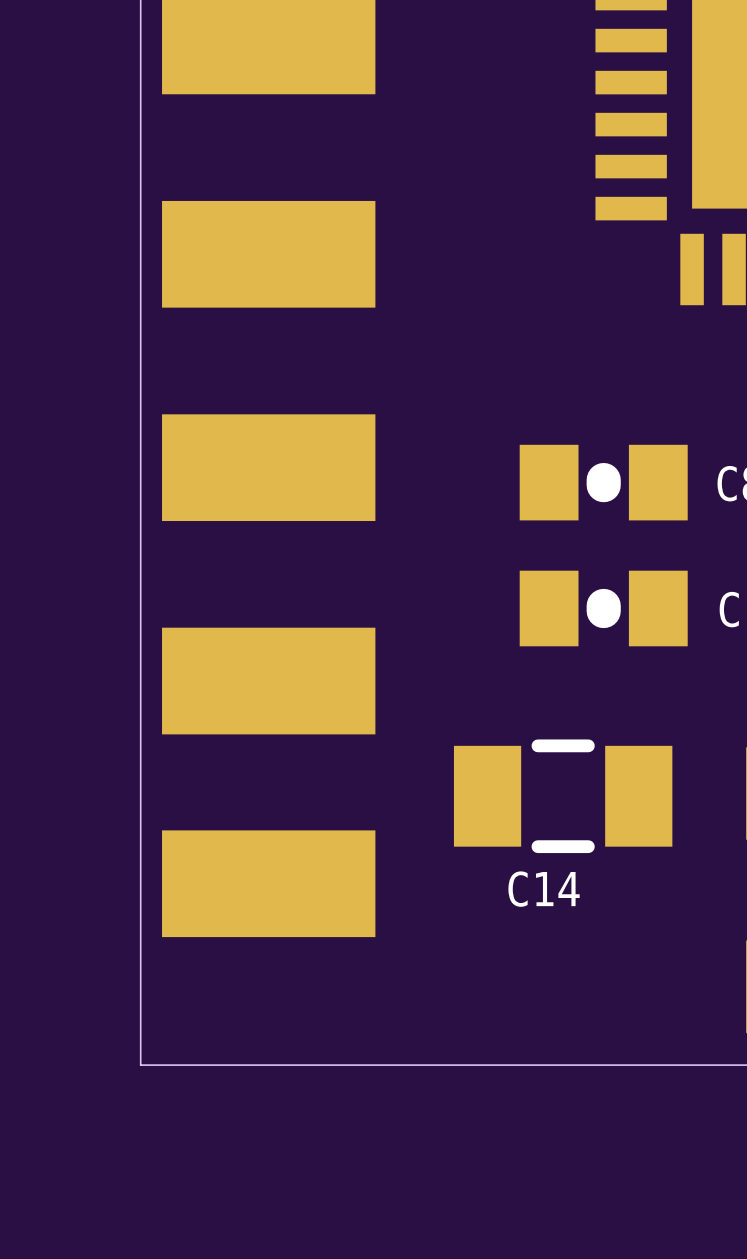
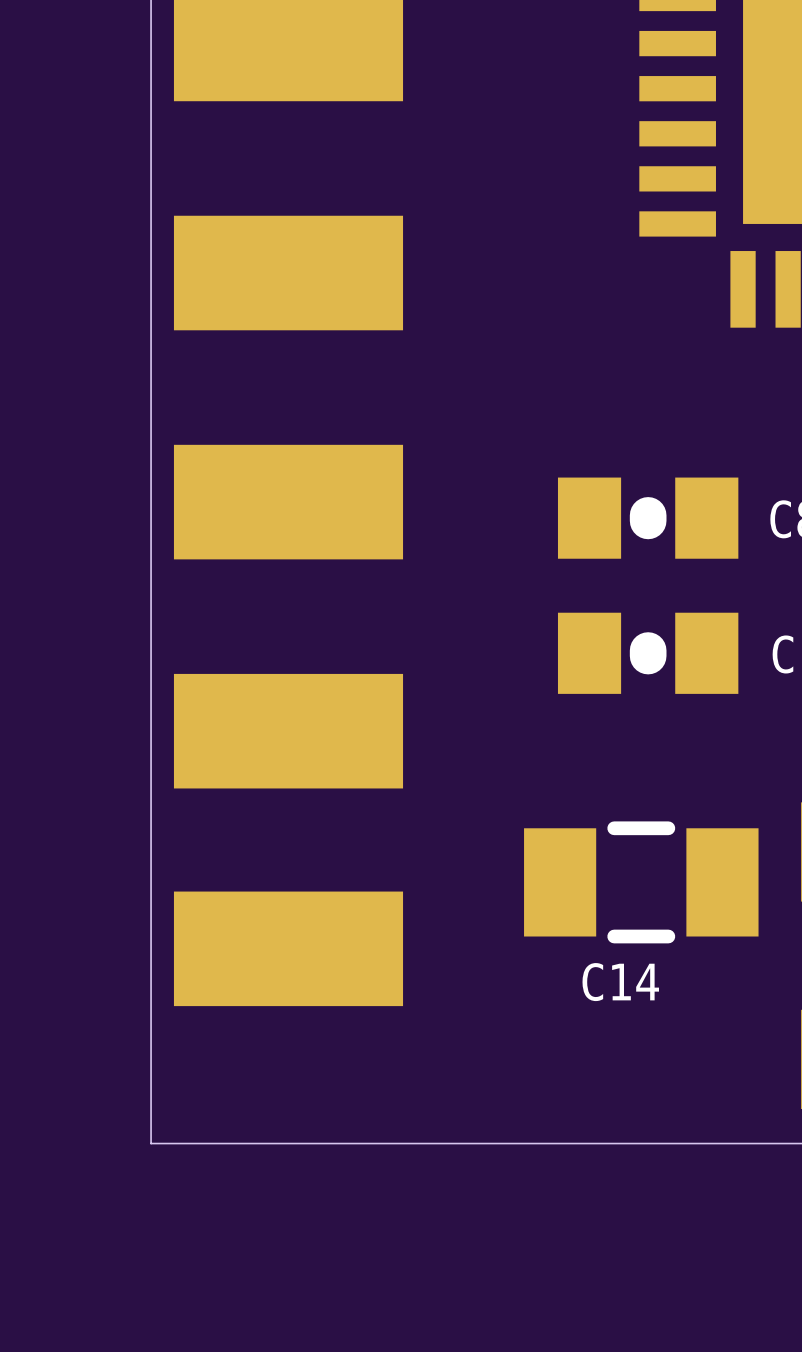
C14 position: (563, 796) -> (641, 882)

